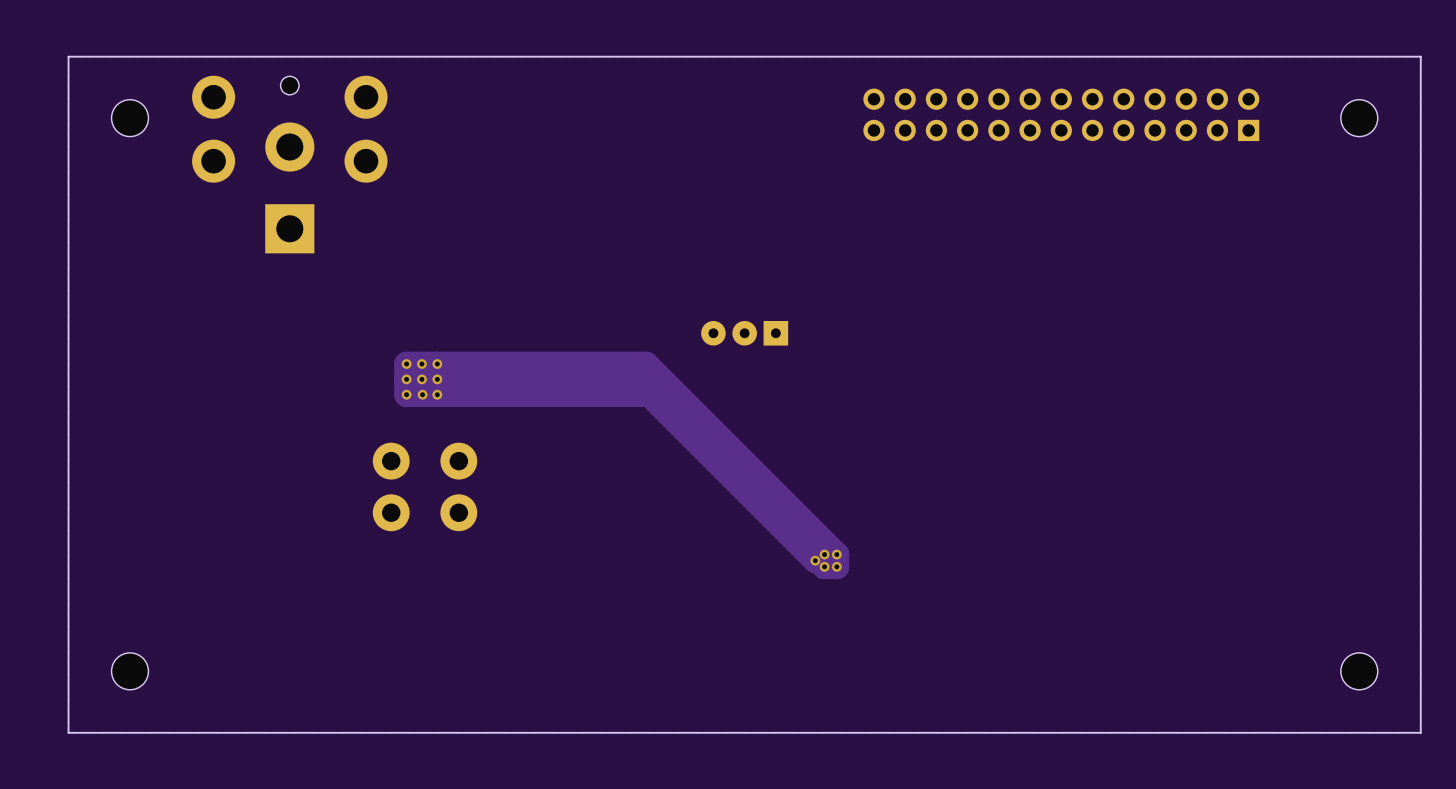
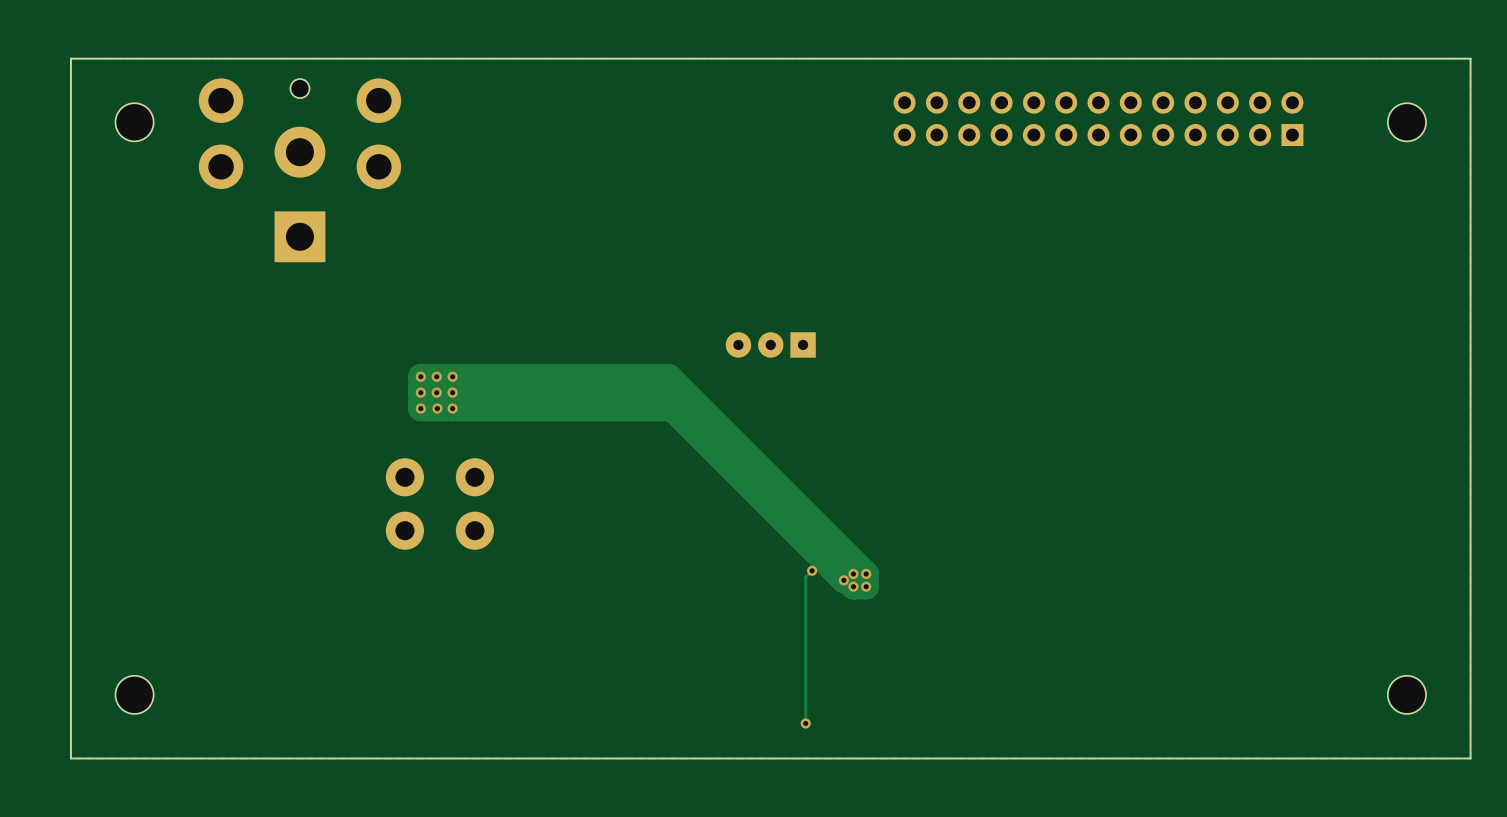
track: none -> (812, 570) (805, 577) (805, 723)
via: none -> (812, 570)
via: none -> (805, 723)

